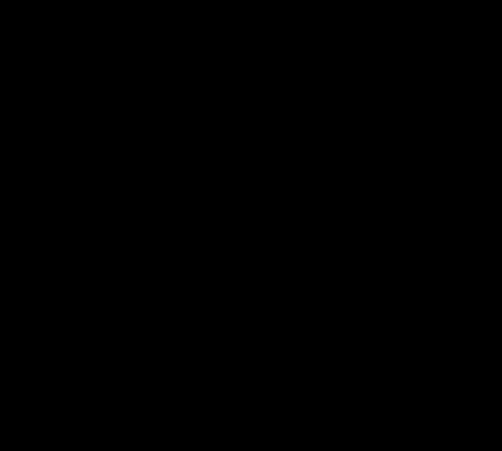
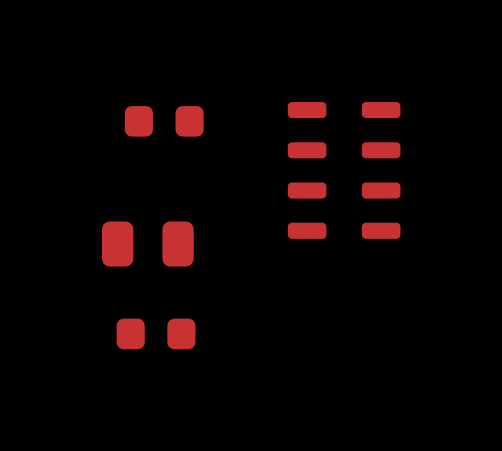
part: none -> (164, 121)
part: none -> (344, 170)
part: none -> (147, 244)
part: none -> (156, 333)

